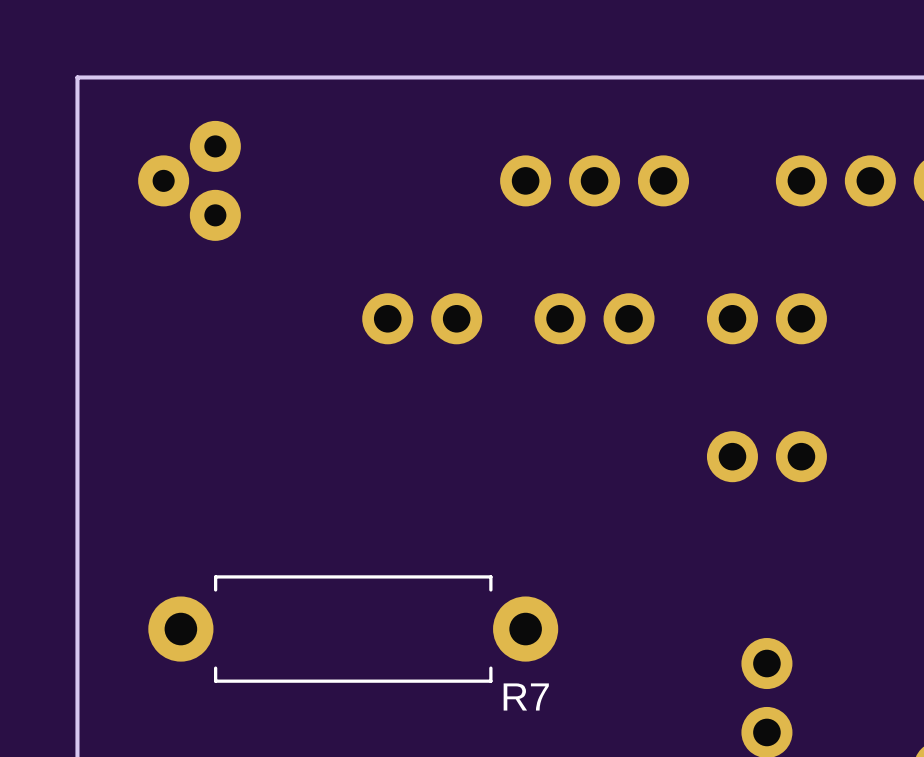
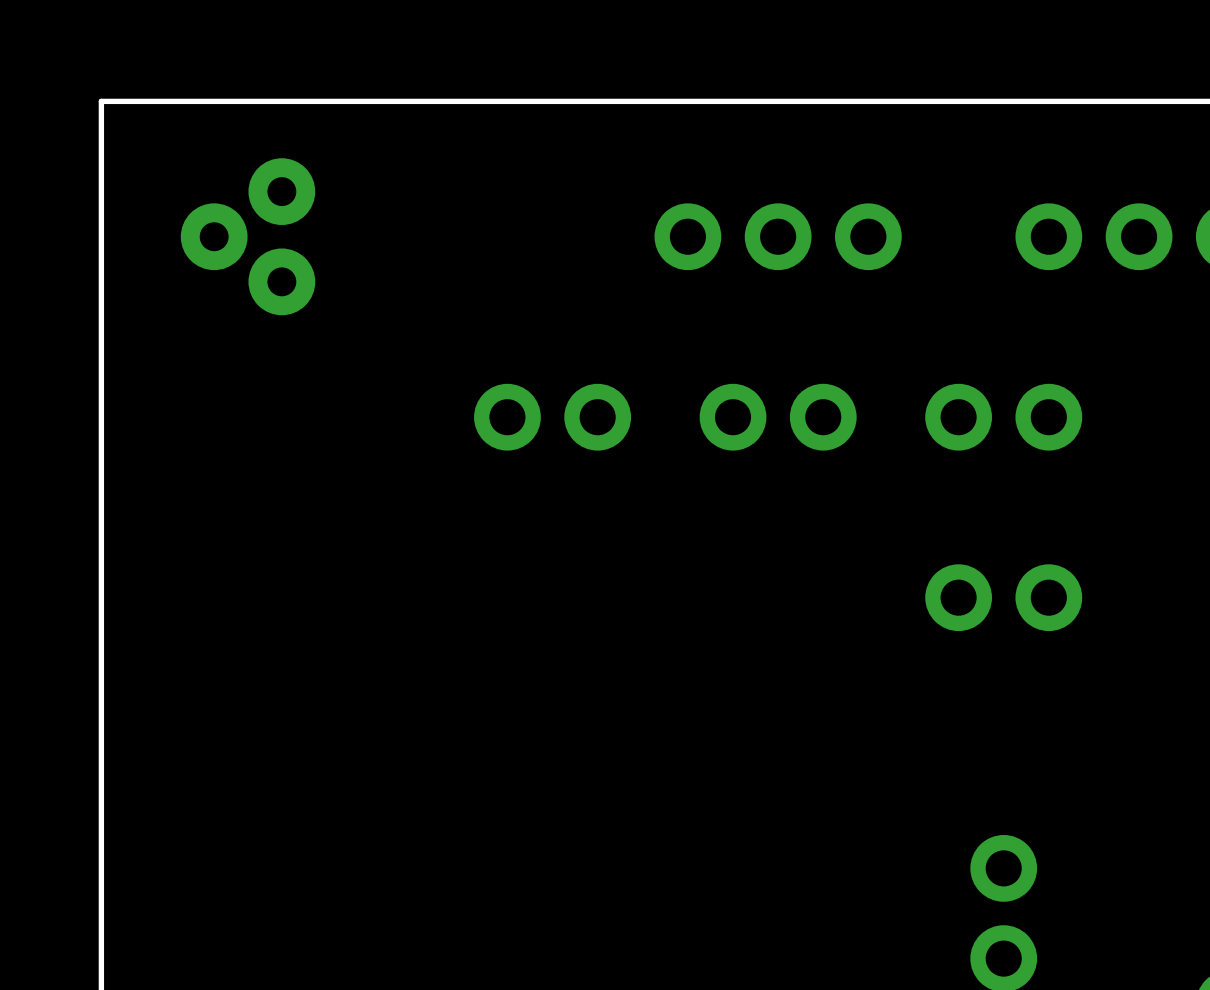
R7: (353, 629) -> none

